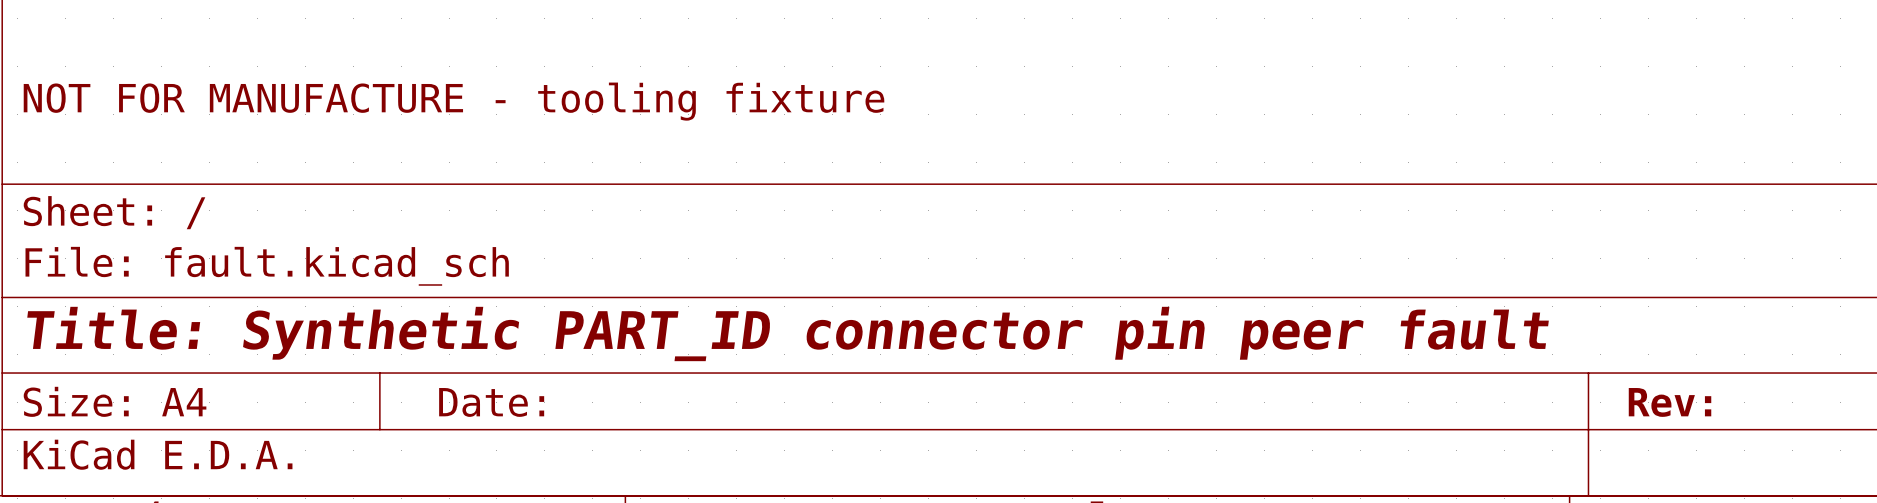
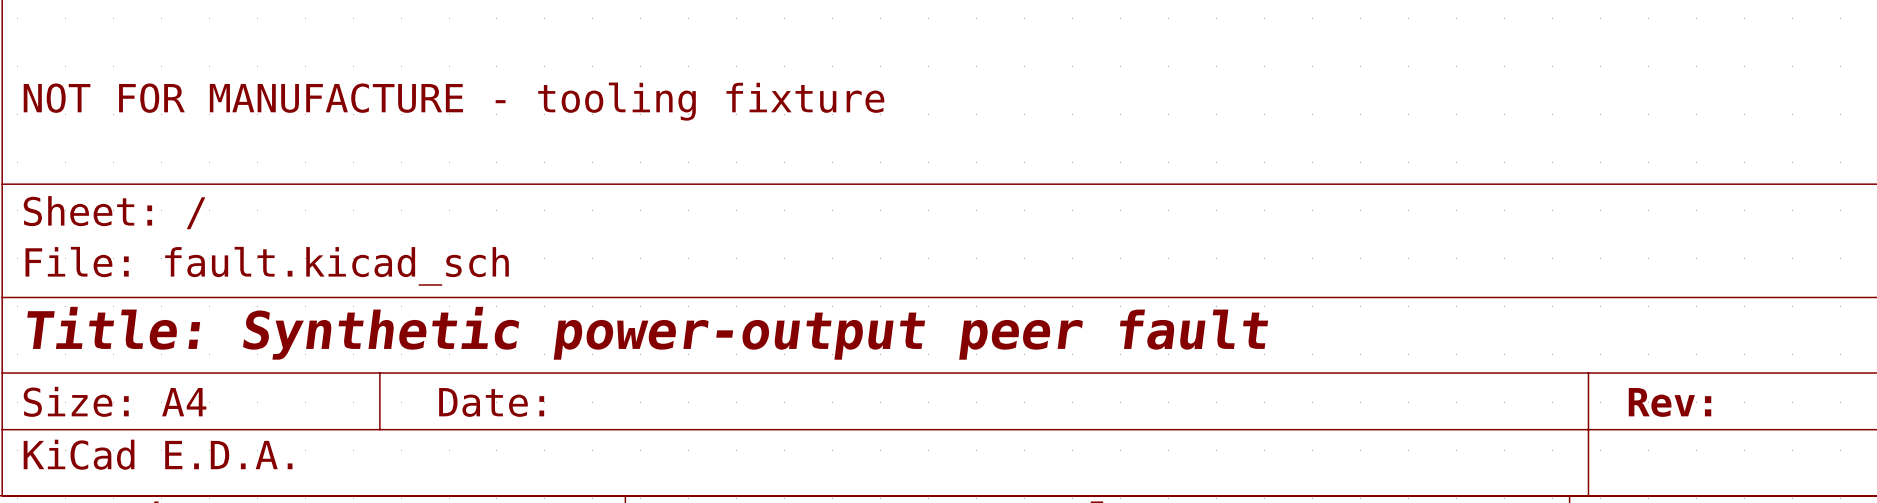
title block: Title: Synthetic PART_ID connector pin peer fault (788, 333) -> Title: Synthetic power-output peer fault (647, 333)

